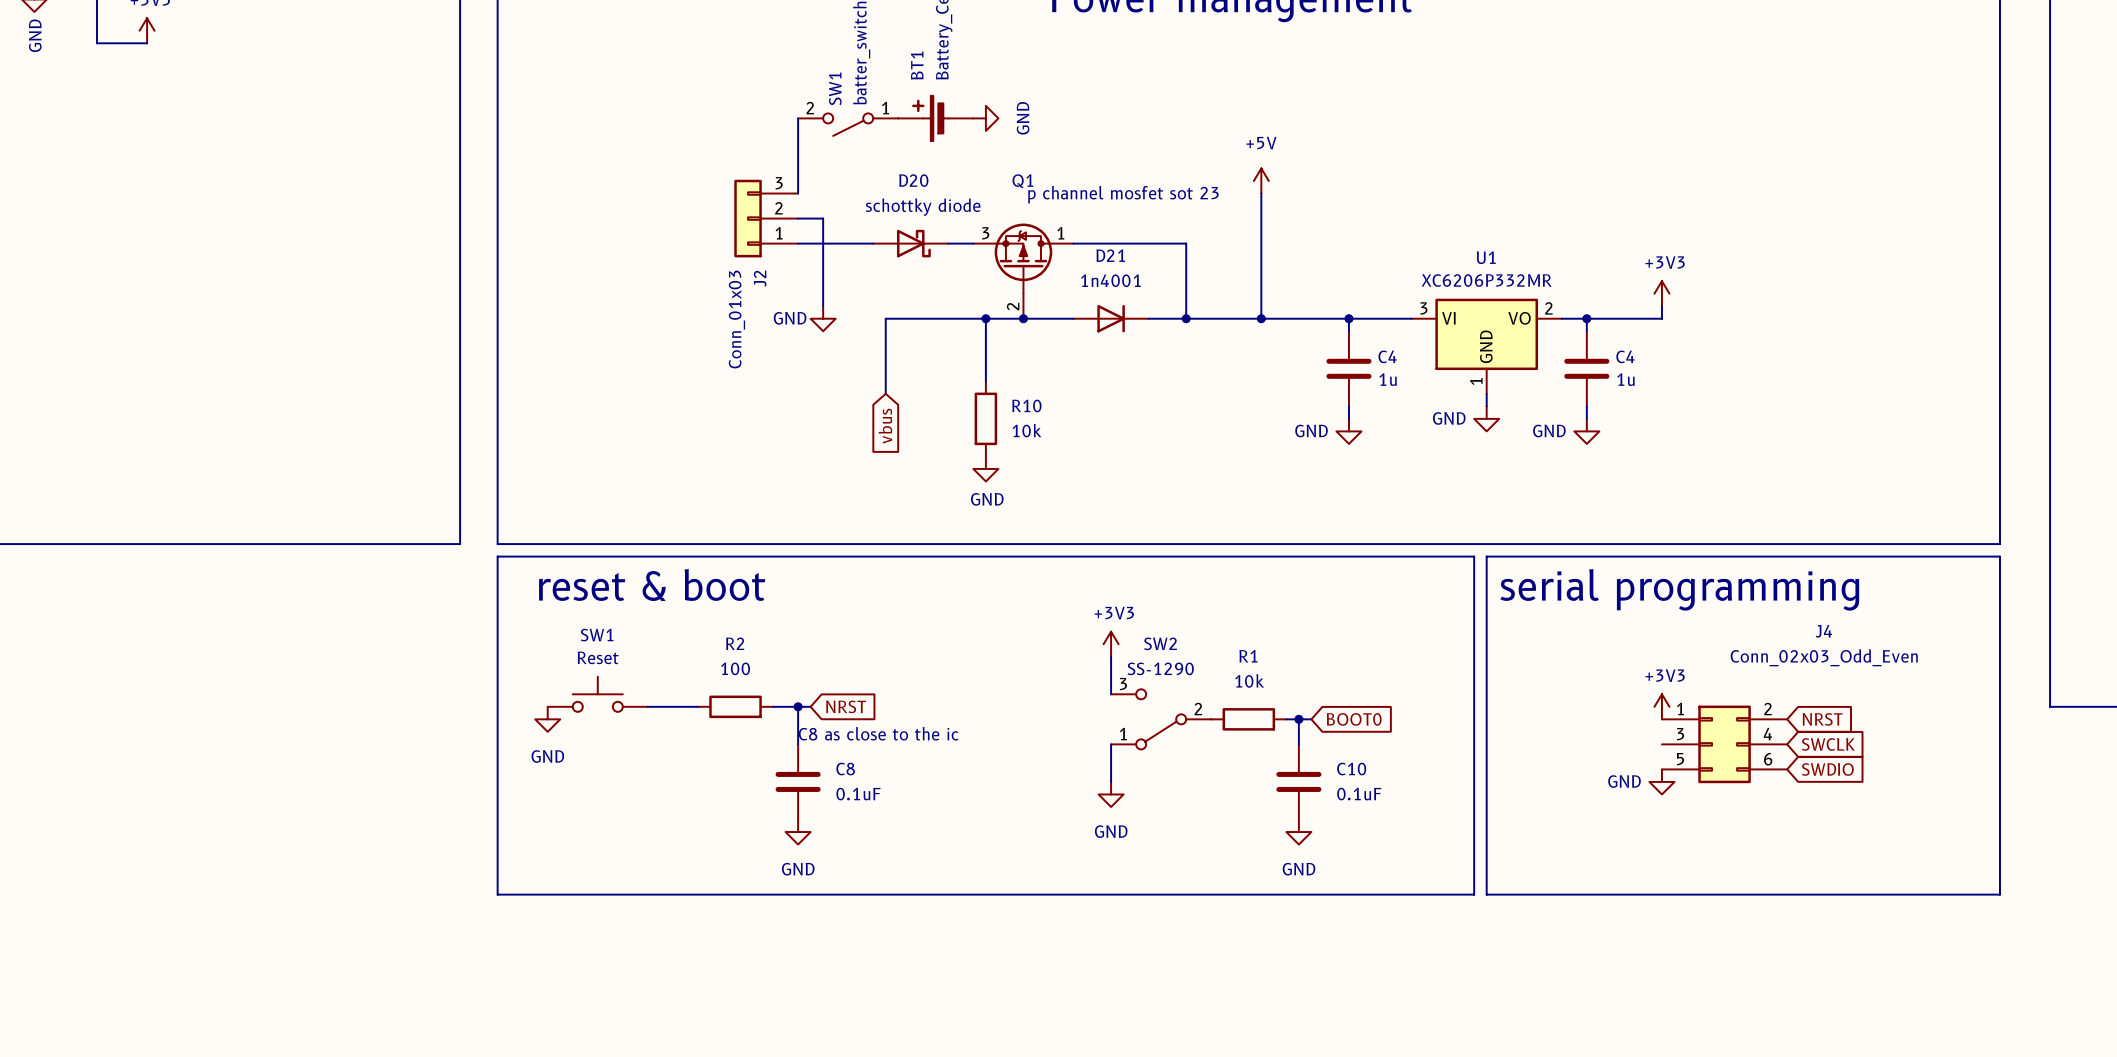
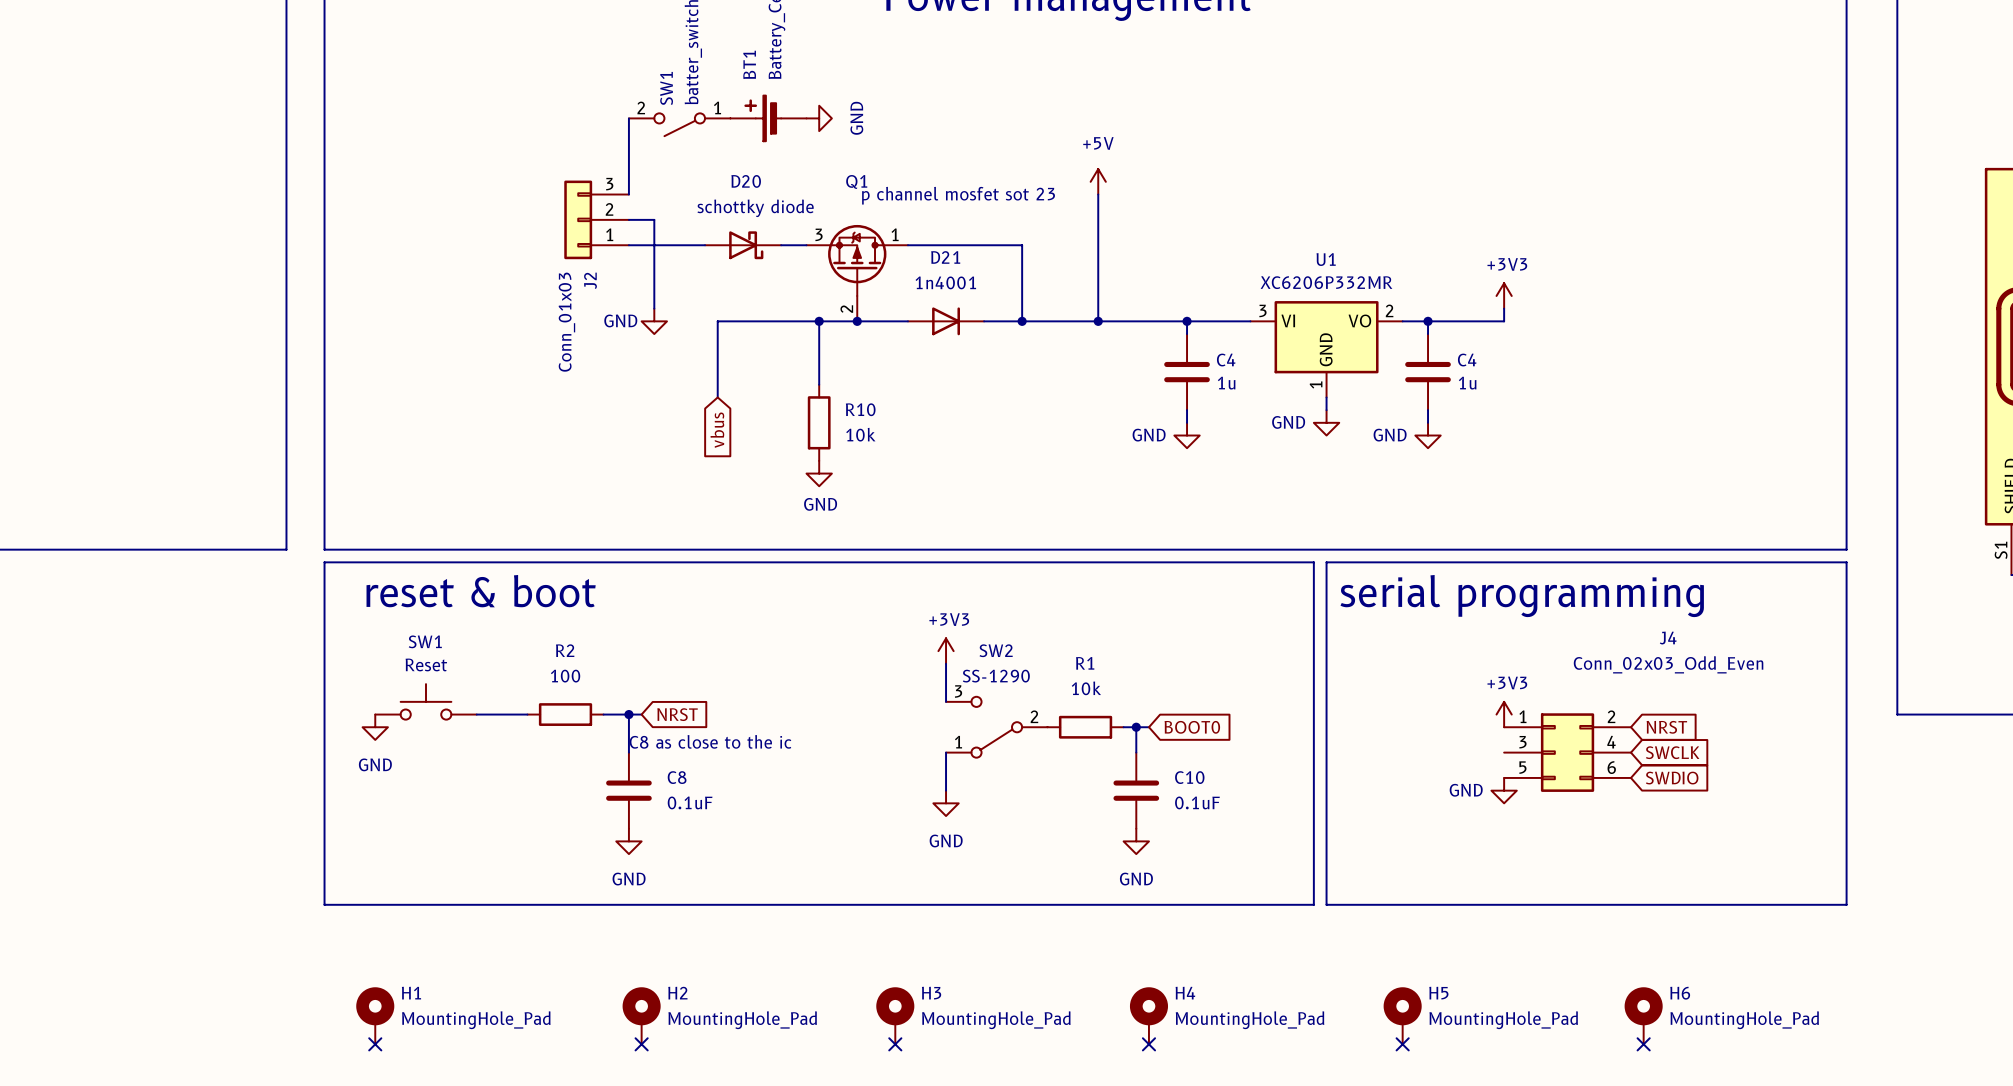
H1: none -> MountingHole_Pad (375, 1015)
H2: none -> MountingHole_Pad (641, 1015)
H3: none -> MountingHole_Pad (895, 1015)
H4: none -> MountingHole_Pad (1148, 1015)
H5: none -> MountingHole_Pad (1402, 1015)
H6: none -> MountingHole_Pad (1643, 1015)
no-connect mark: none -> (375, 1044)
no-connect mark: none -> (641, 1044)
no-connect mark: none -> (895, 1044)
no-connect mark: none -> (1148, 1044)
no-connect mark: none -> (1402, 1044)
no-connect mark: none -> (1643, 1044)

